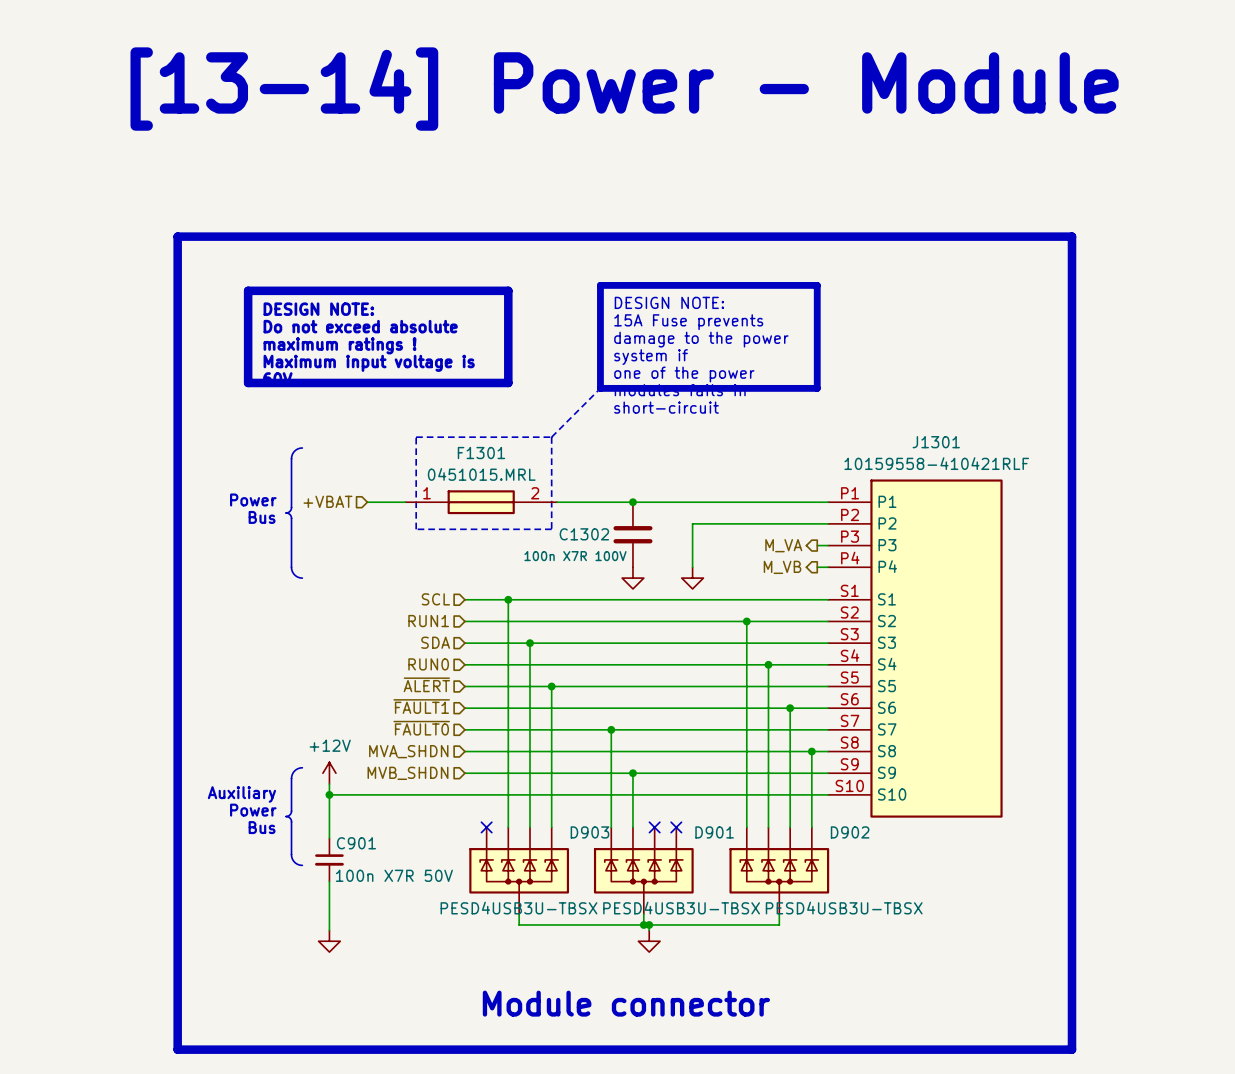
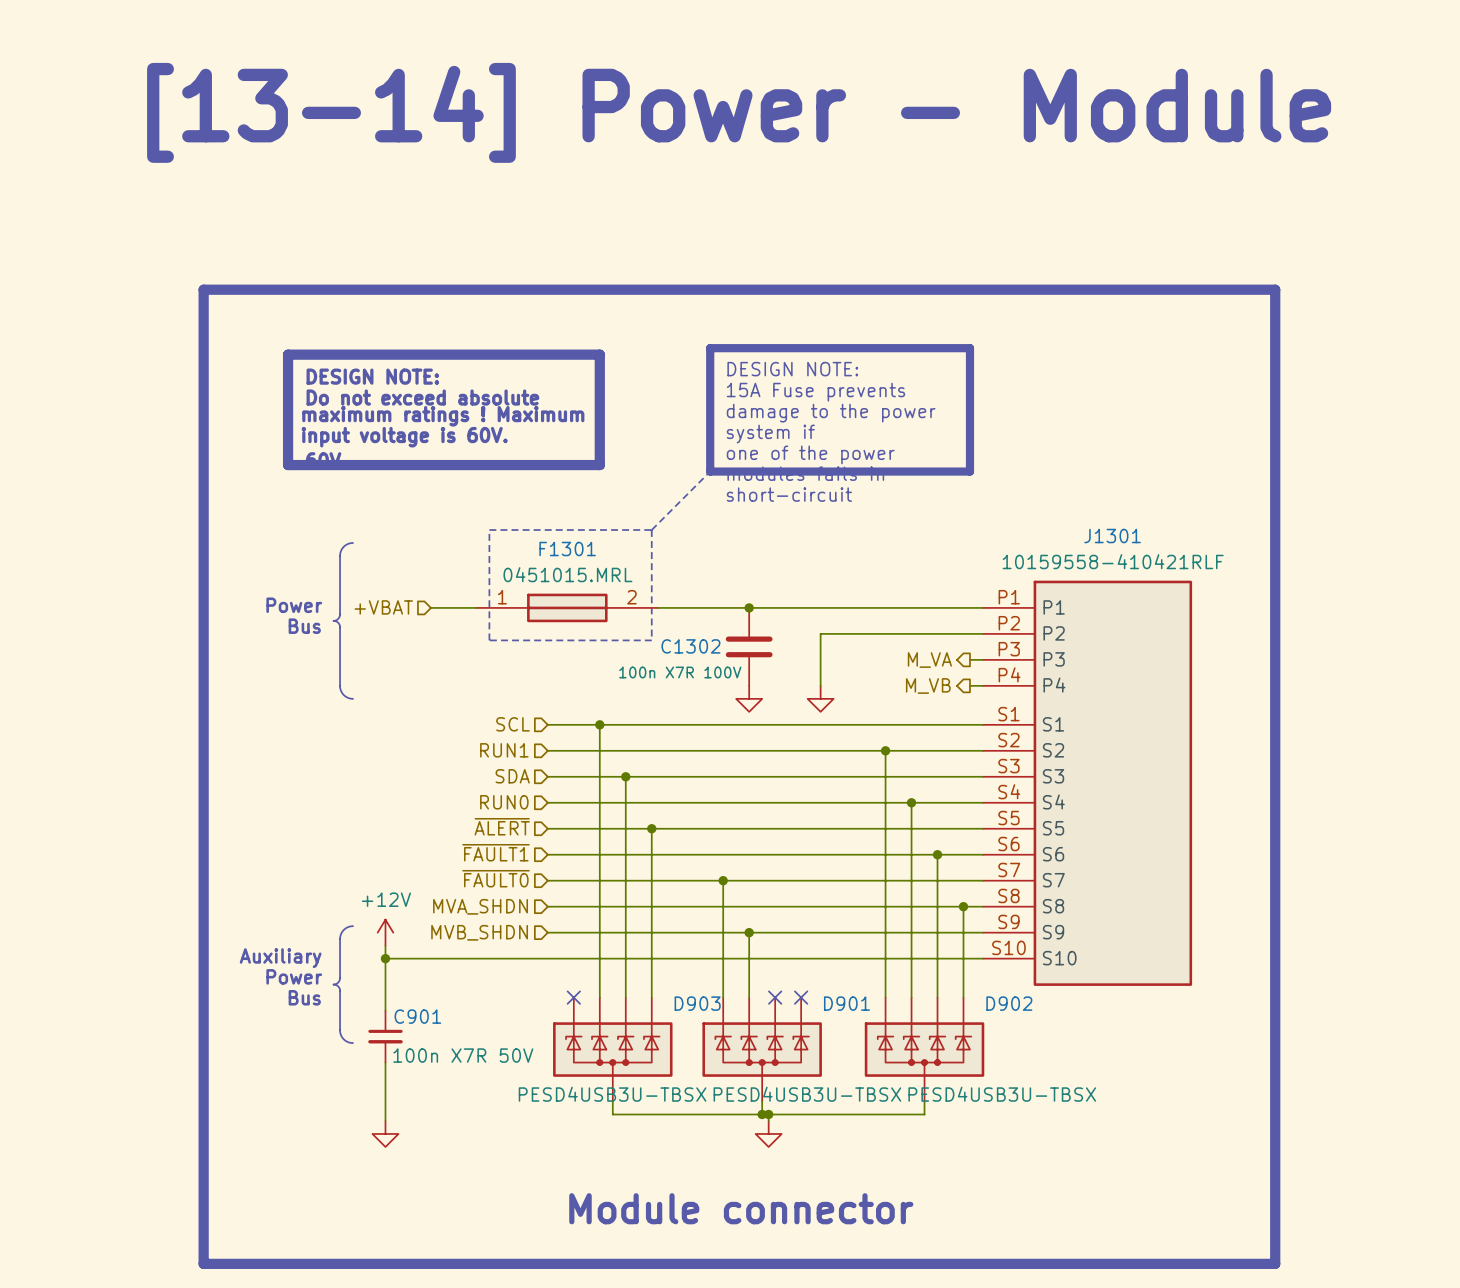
text: maximum ratings ! (340, 345) -> maximum ratings ! Maximum (443, 416)
text: Maximum input voltage is (369, 363) -> input voltage is 60V. (404, 437)

